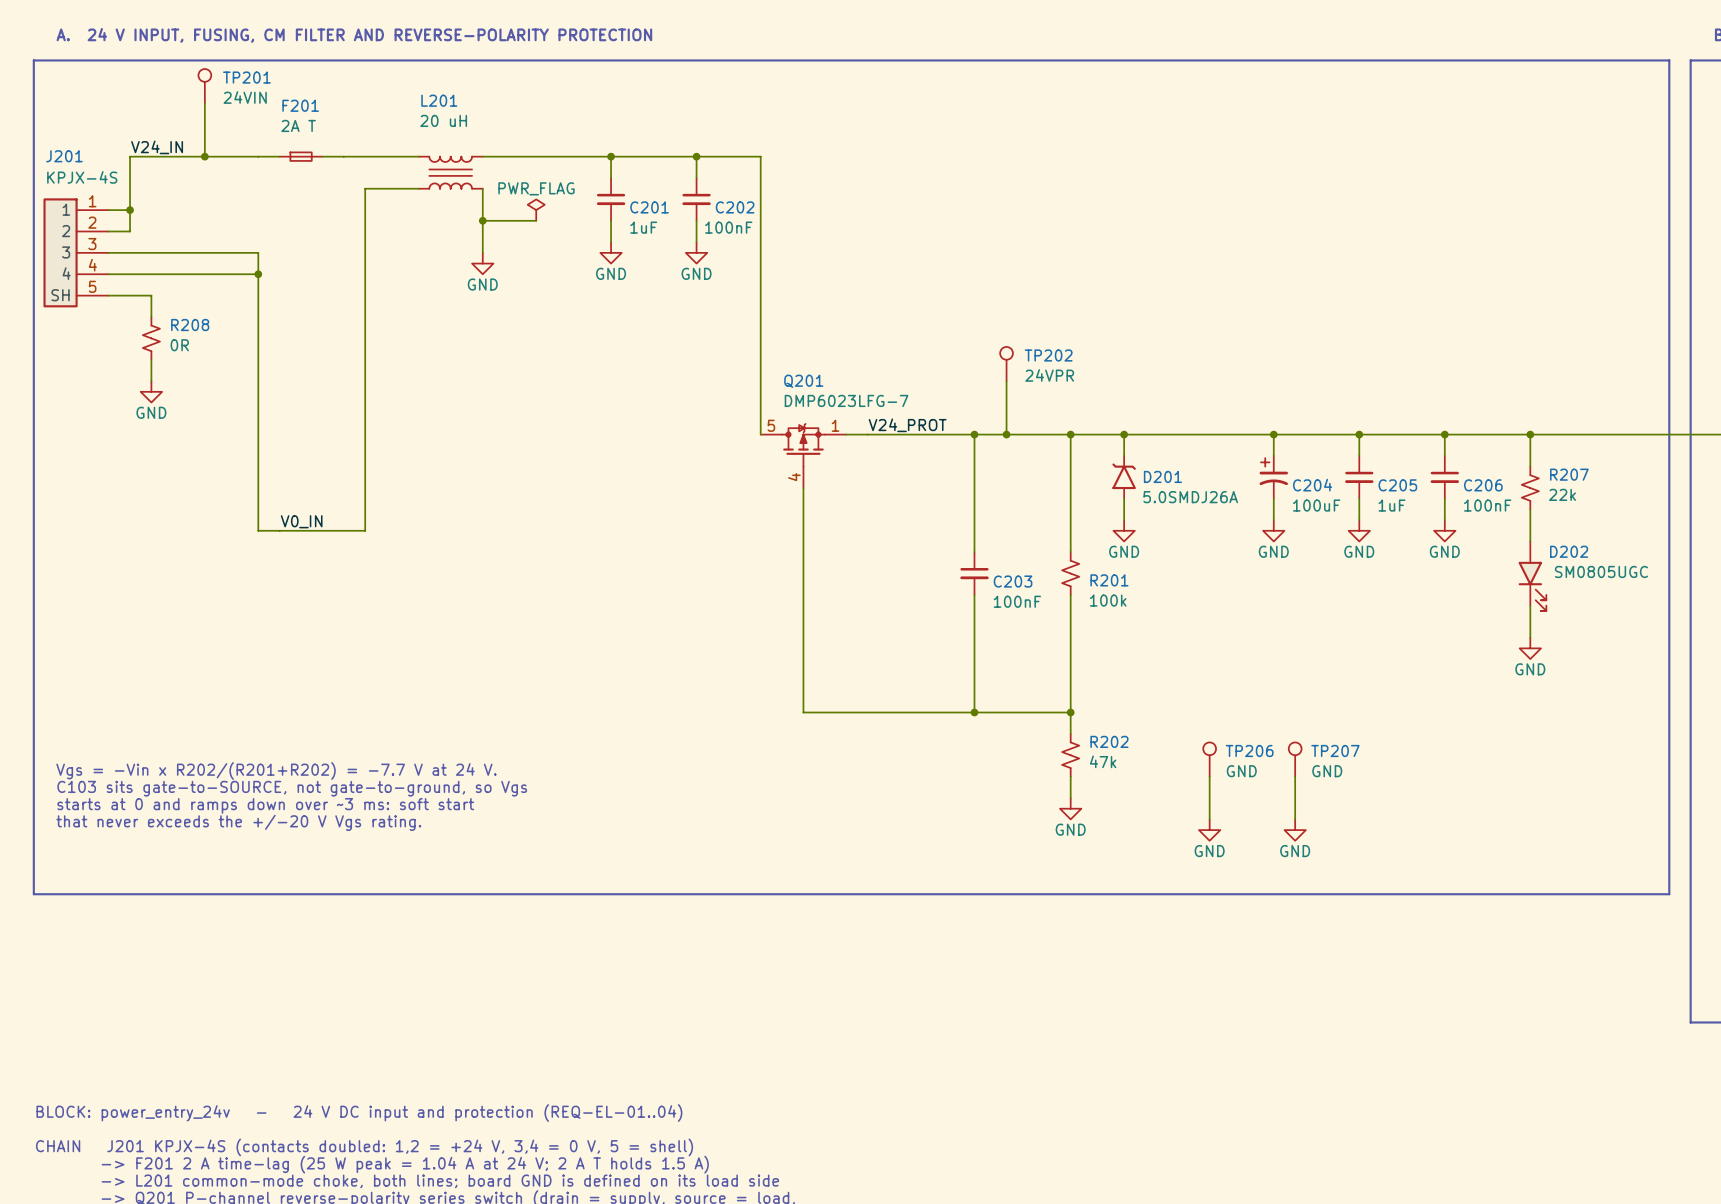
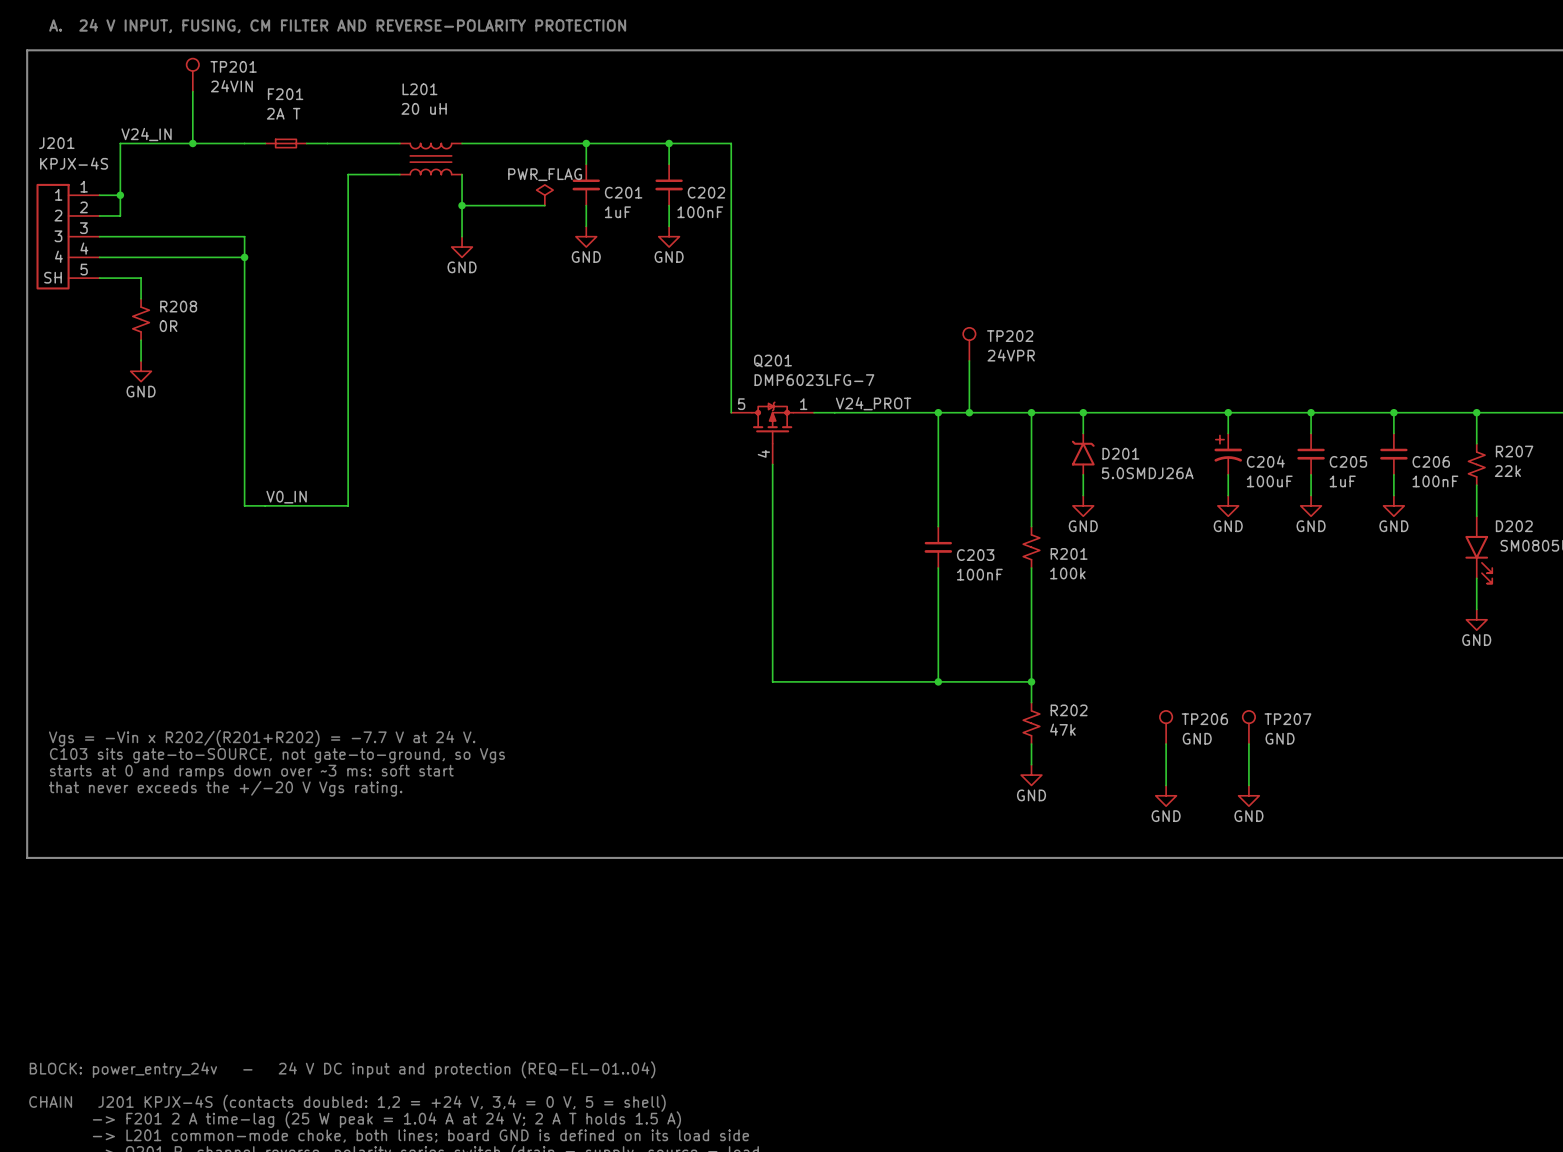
power symbol position: PWR_FLAG (536, 210) -> PWR_FLAG (544, 195)
wire: none -> (513, 205) (544, 205)

